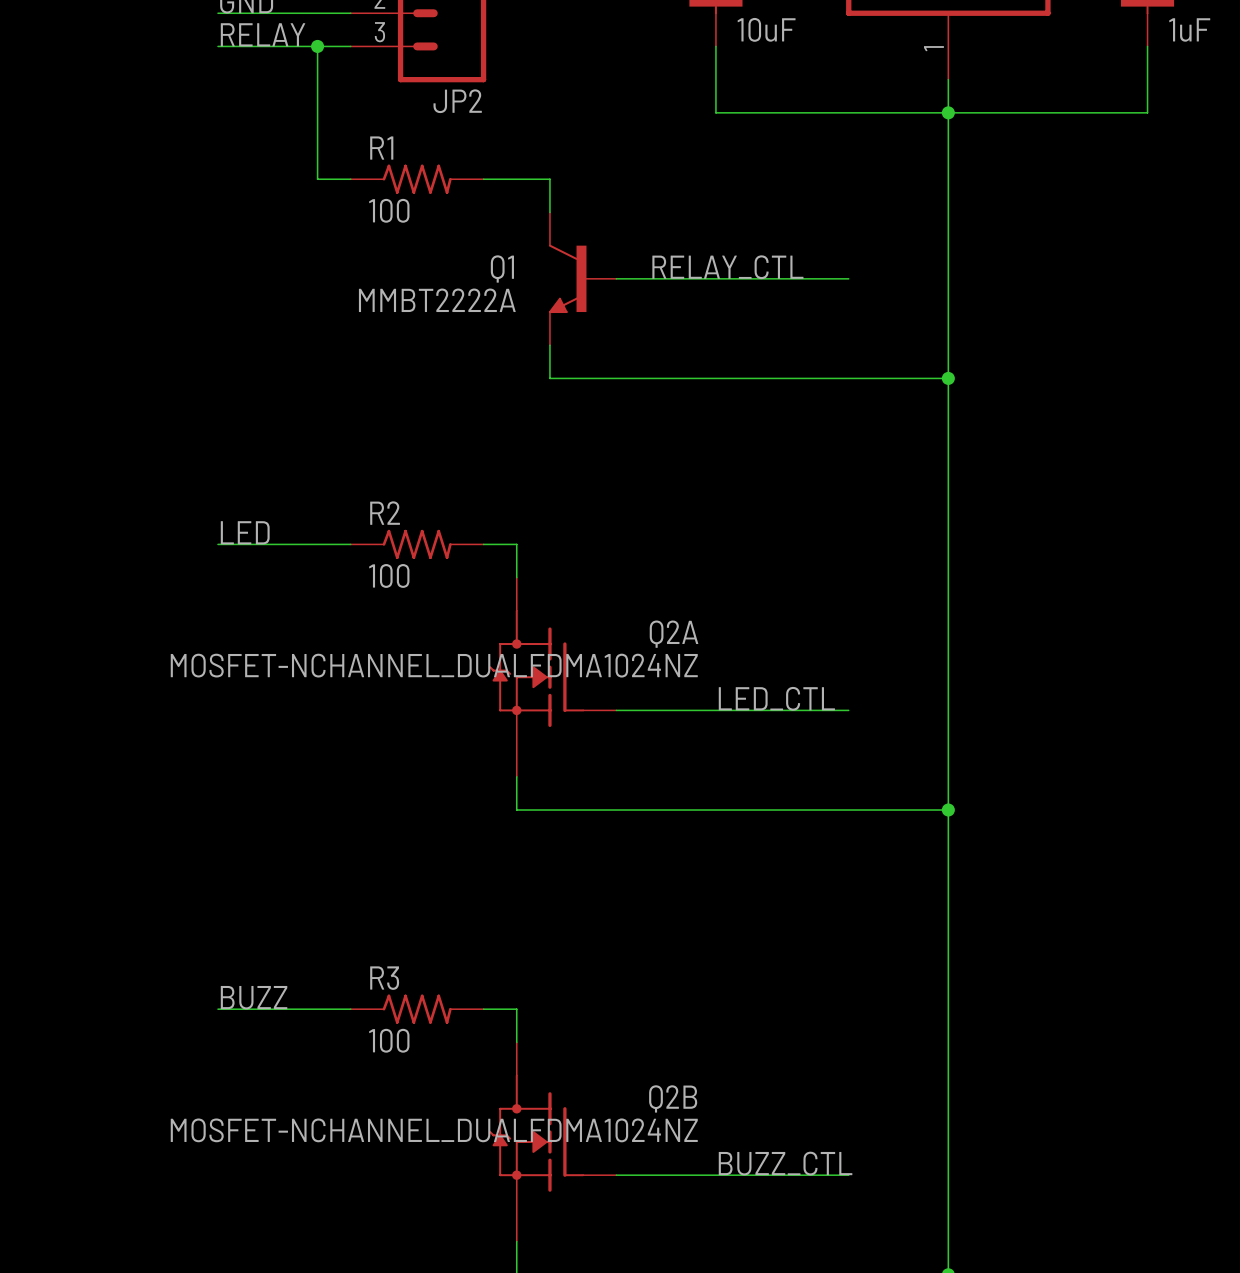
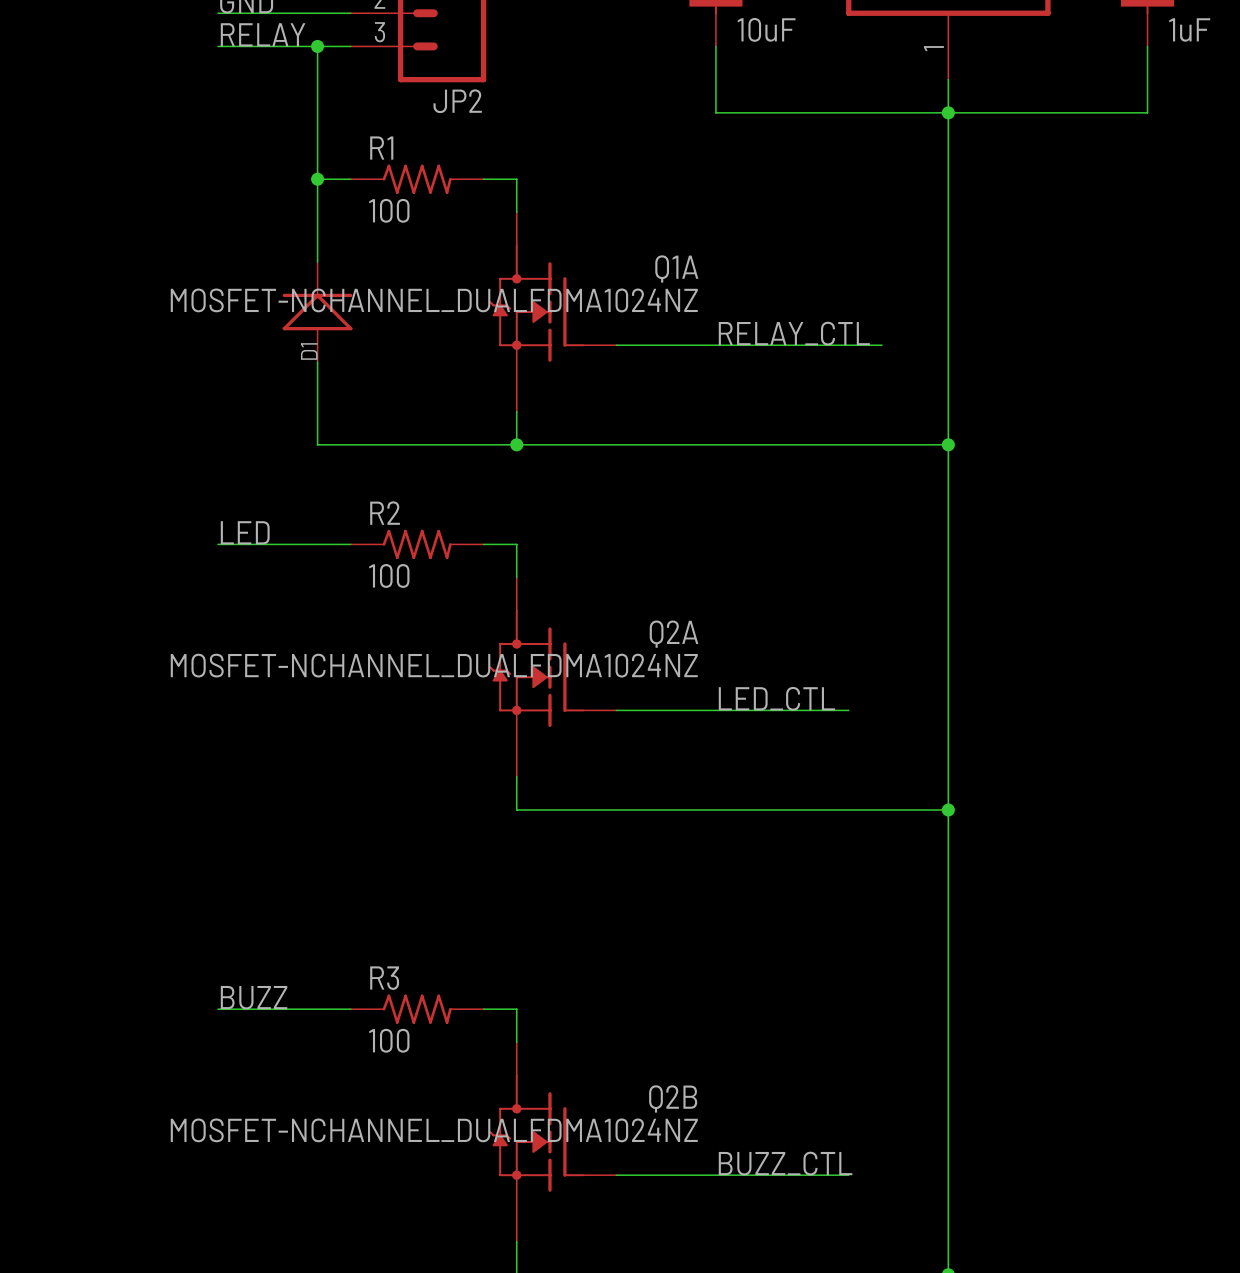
wire: none -> (317, 179) (317, 262)
junction: none -> (317, 179)
wire: (516, 179) (549, 179) (549, 212) -> (516, 179) (516, 212)
label position: RELAY_CTL (727, 267) -> RELAY_CTL (794, 333)
Q1: MMBT2222A (582, 278) -> none
wire: (616, 278) (848, 278) -> none
D1: none -> (317, 312)
Q1A: none -> MOSFET-NCHANNEL_DUALFDMA1024NZ (552, 312)
wire: (549, 345) (549, 378) (948, 378) -> none
wire: none -> (616, 345) (881, 345)
wire: none -> (317, 361) (317, 444) (948, 444)
junction position: (948, 378) -> (948, 444)
wire: none -> (516, 411) (516, 444)
junction: none -> (516, 444)

